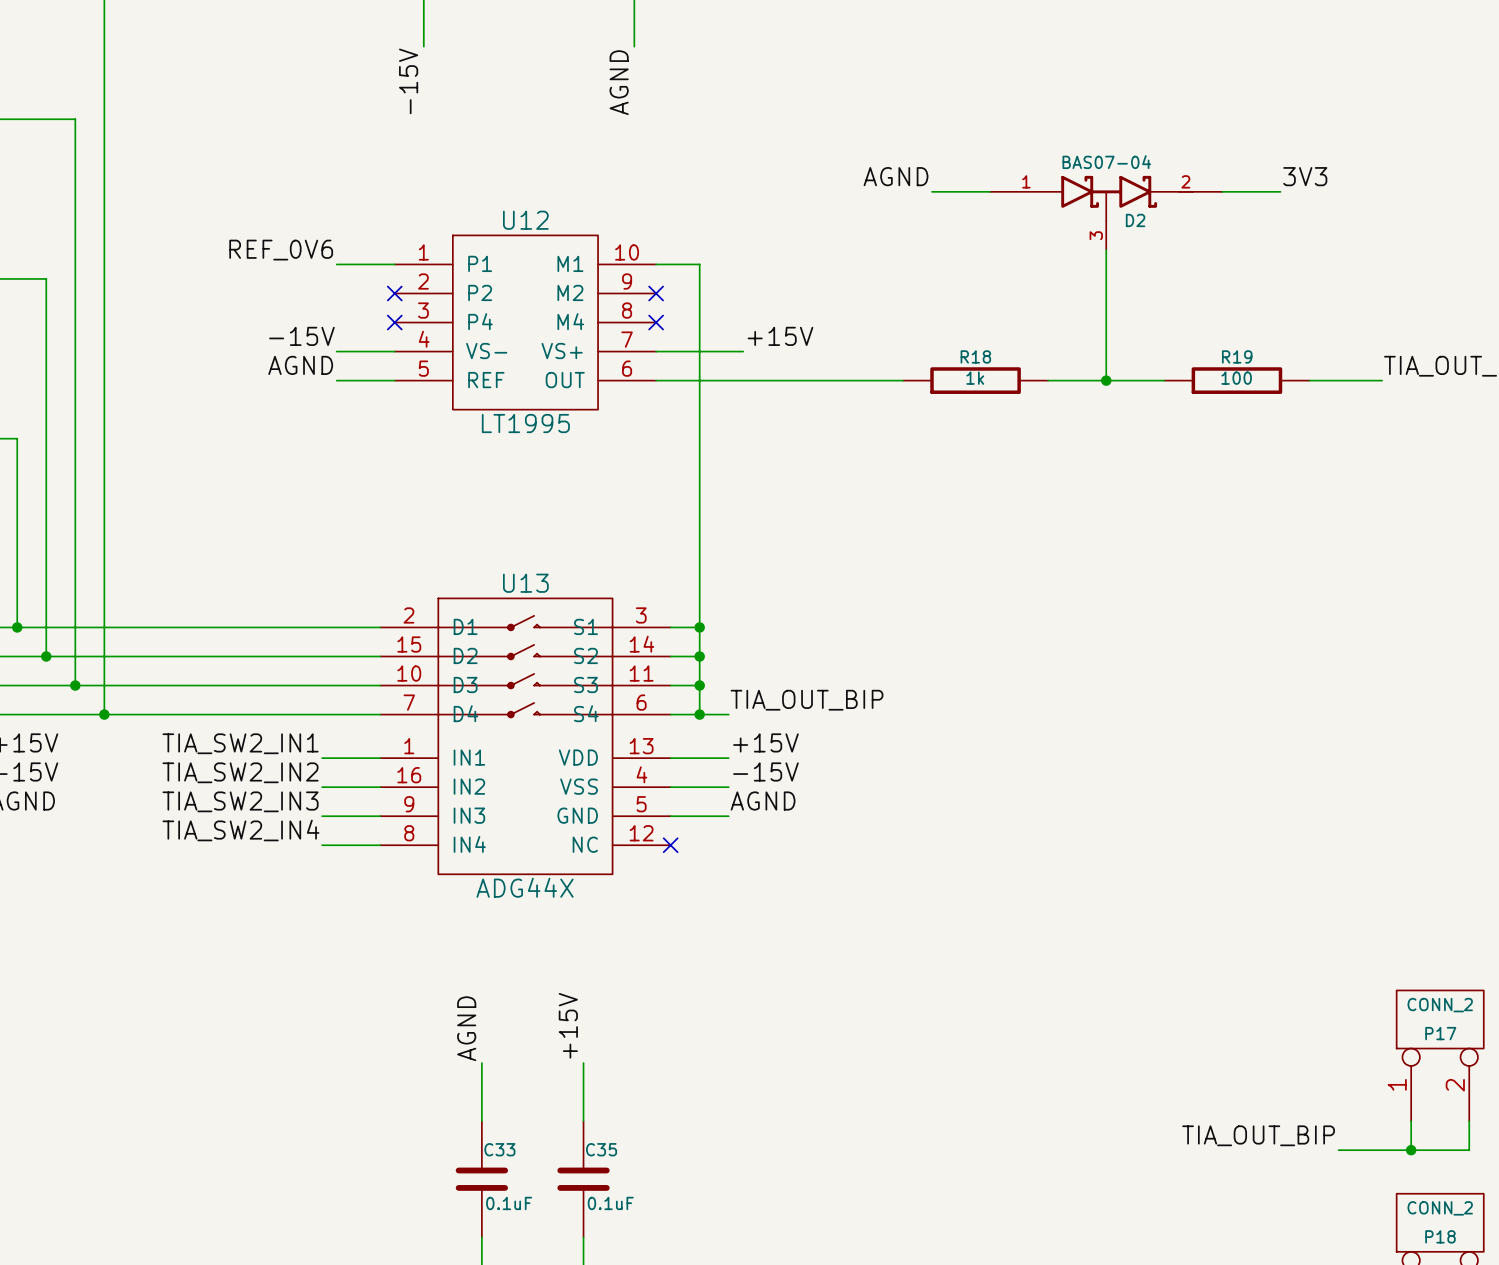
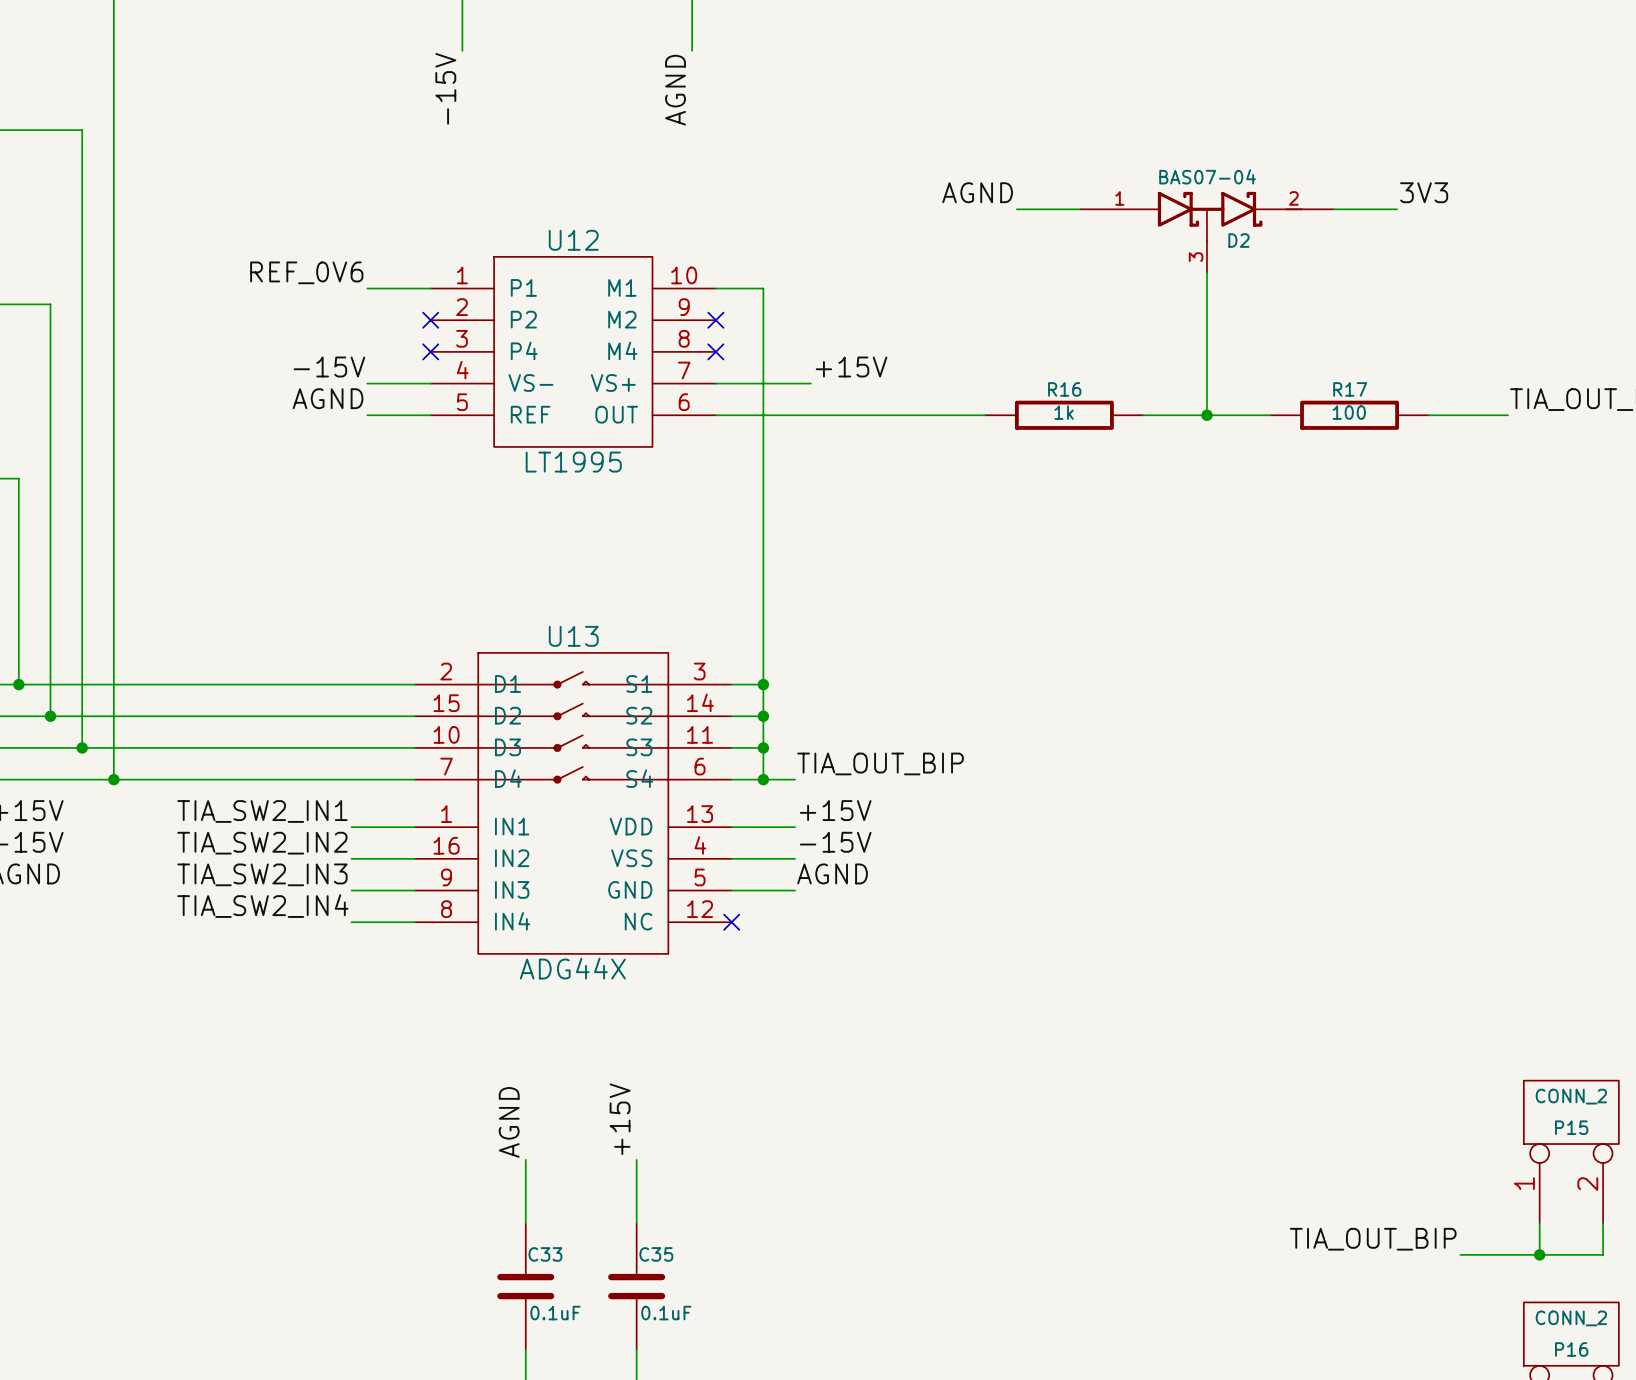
R18 name: R18 (975, 356) -> R16 (1064, 389)
R19 name: R19 (1237, 356) -> R17 (1350, 389)
P17 name: P17 (1440, 1033) -> P15 (1571, 1127)
P18 name: P18 (1440, 1236) -> P16 (1571, 1349)

